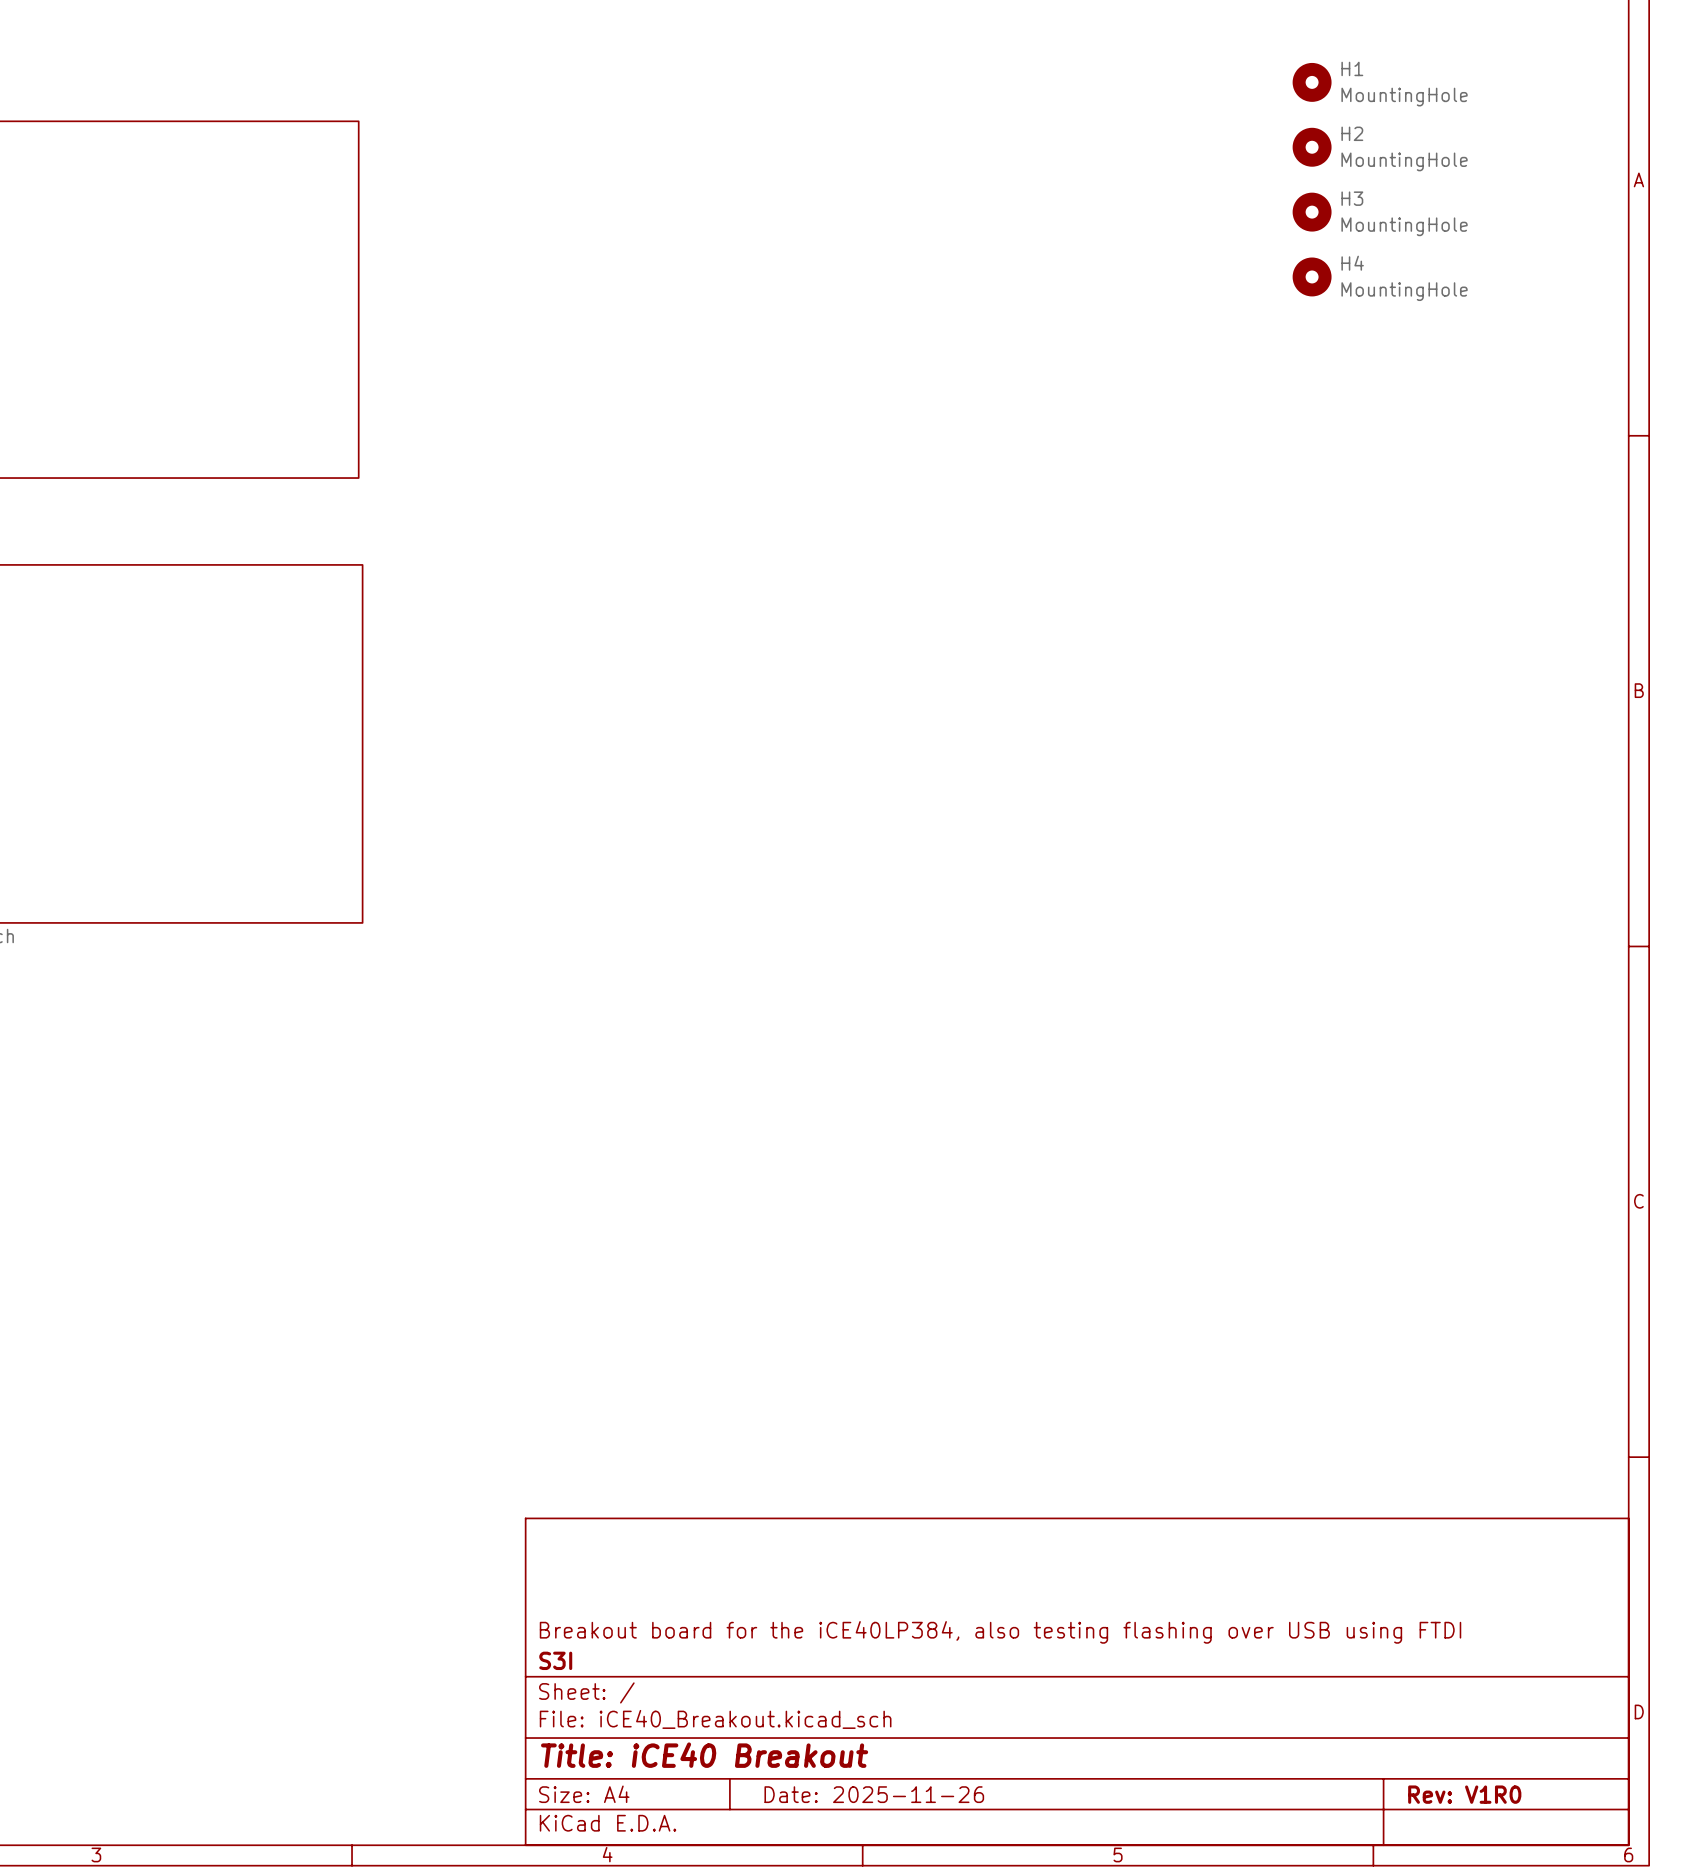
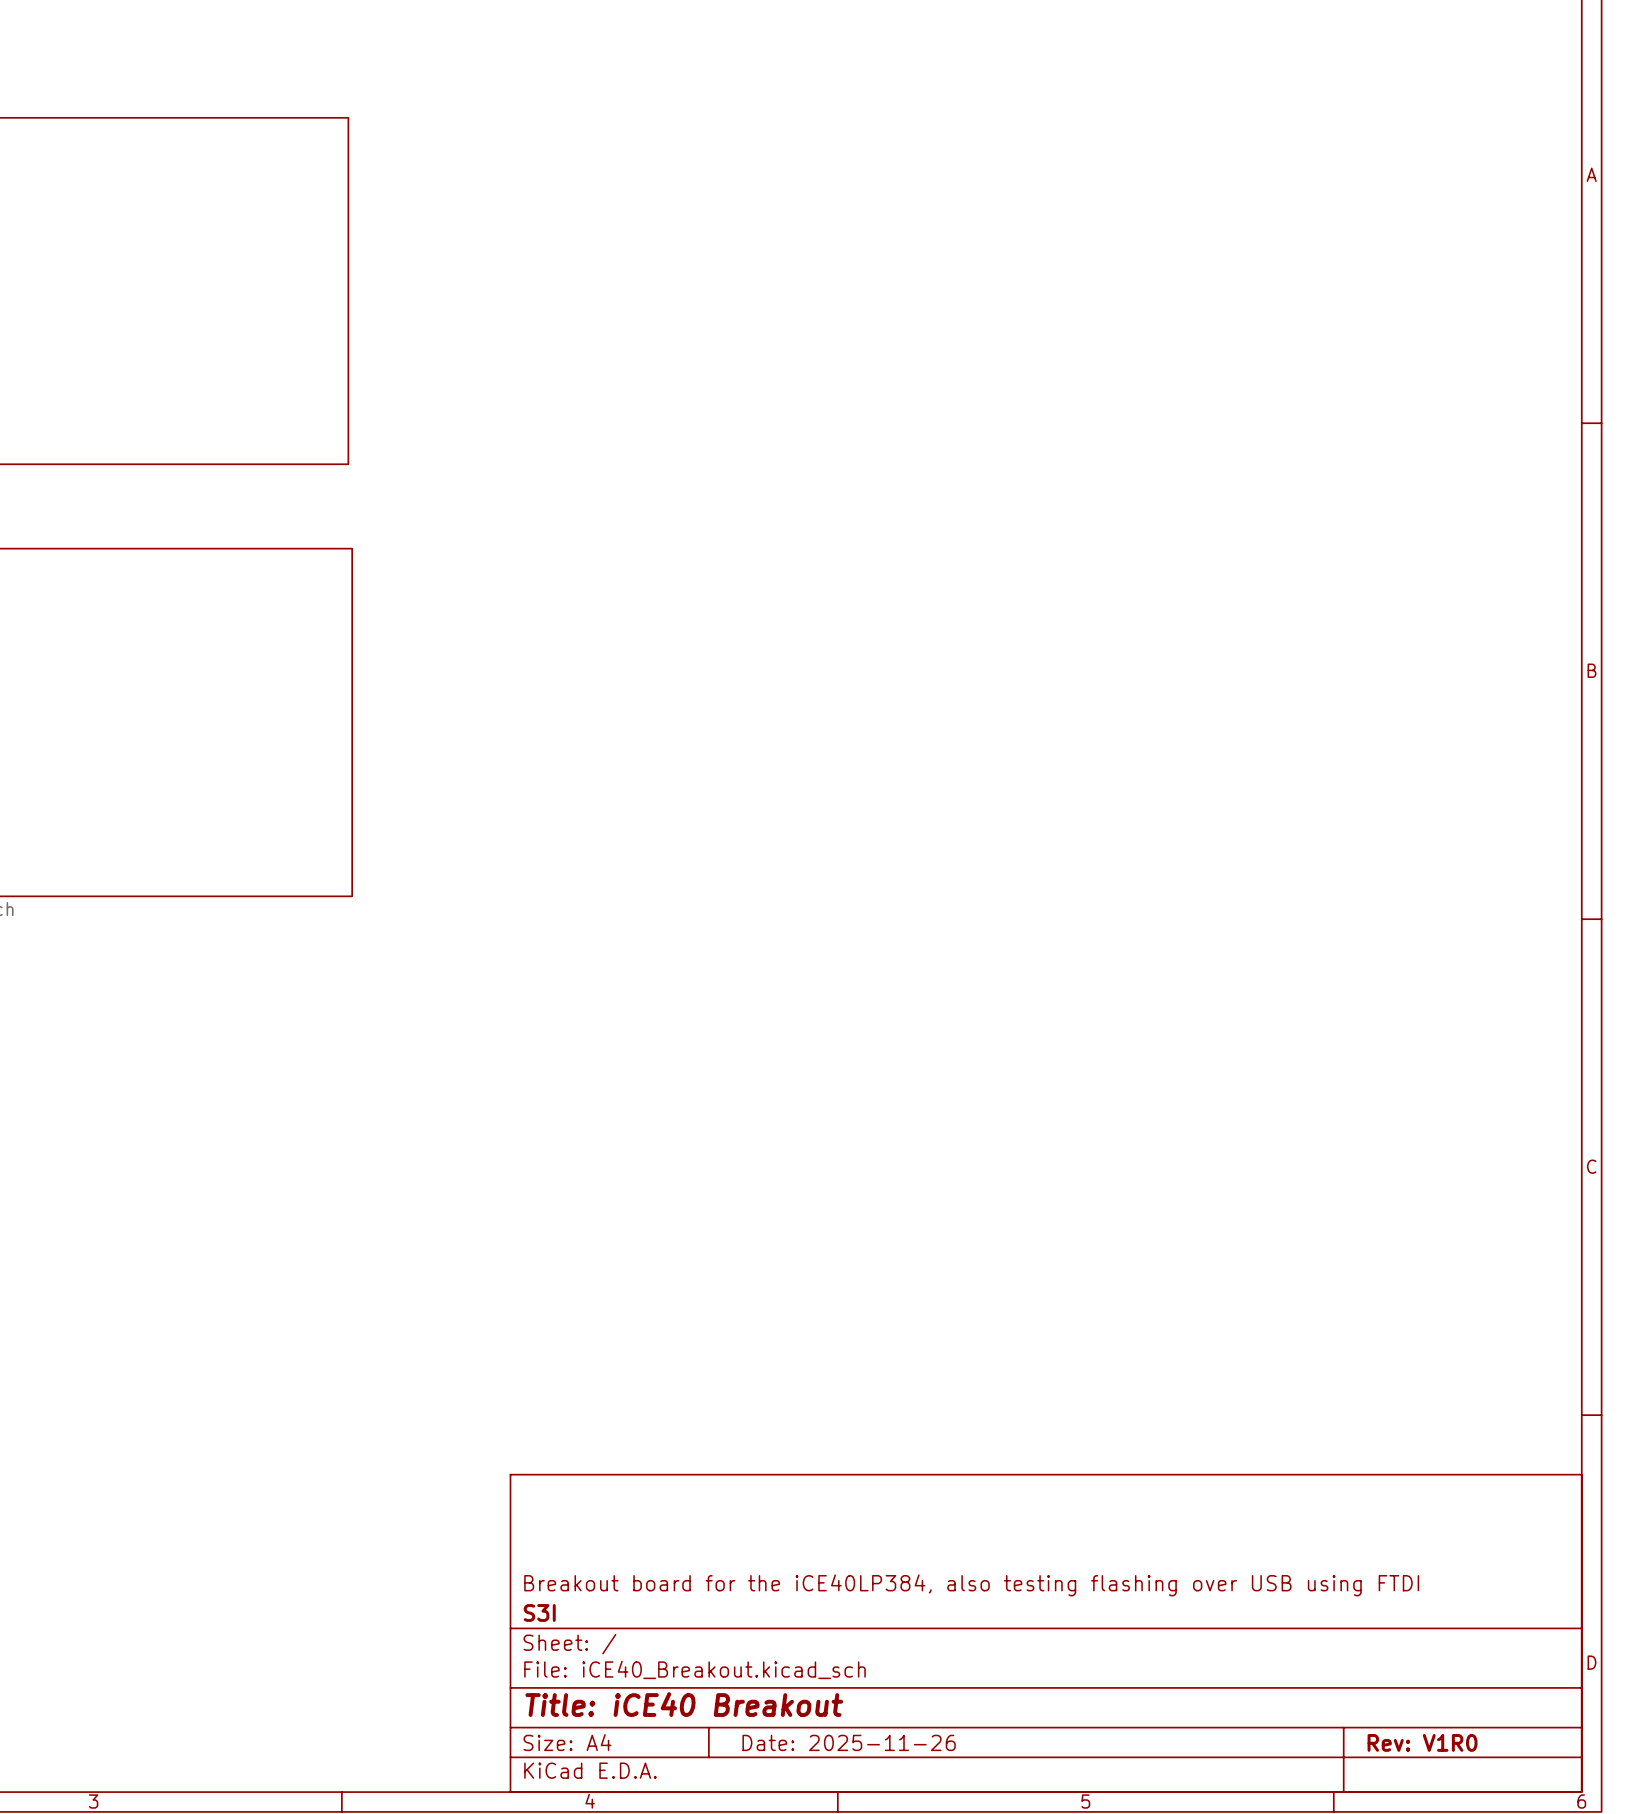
H1: MountingHole (1312, 82) -> none
H2: MountingHole (1312, 147) -> none
H3: MountingHole (1312, 212) -> none
H4: MountingHole (1312, 276) -> none

